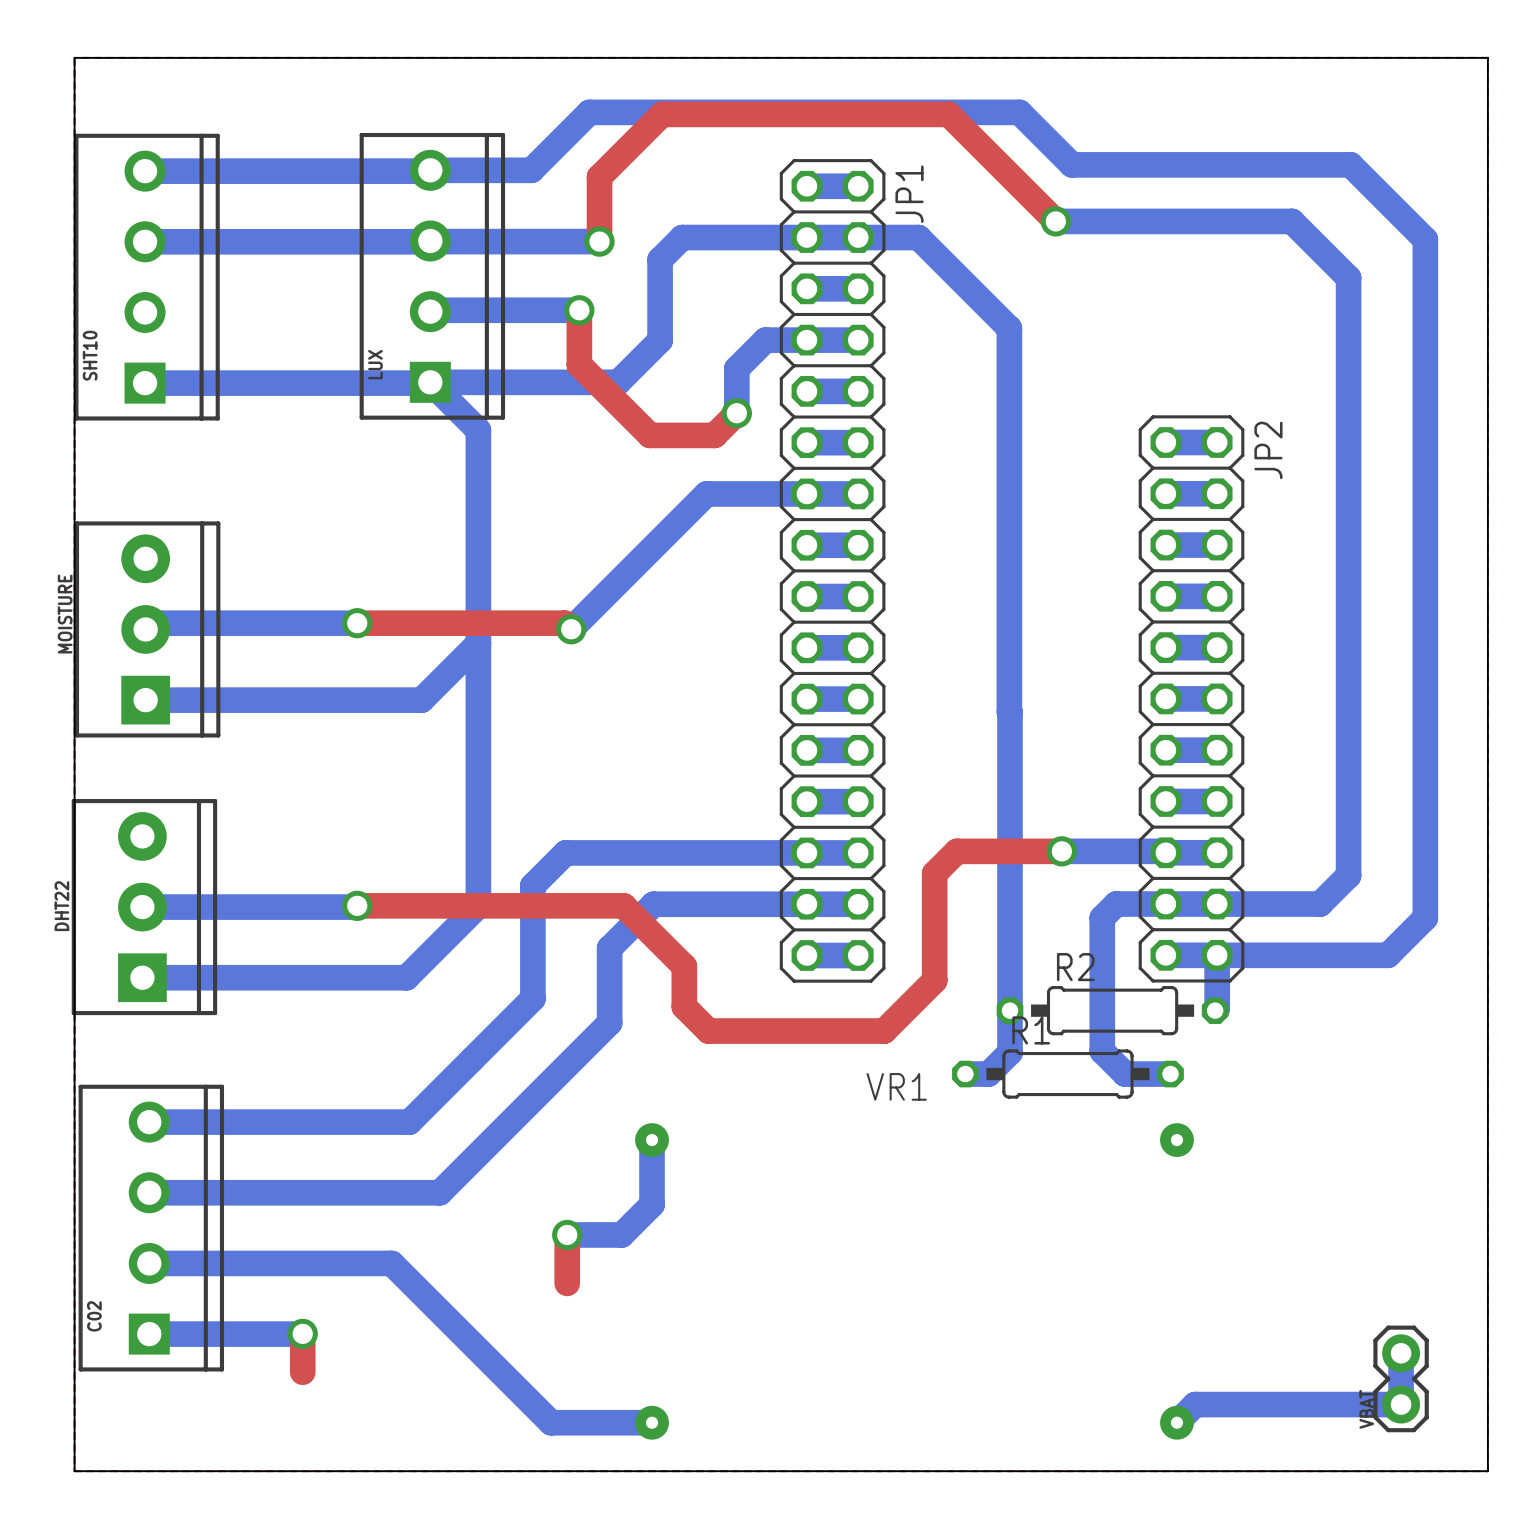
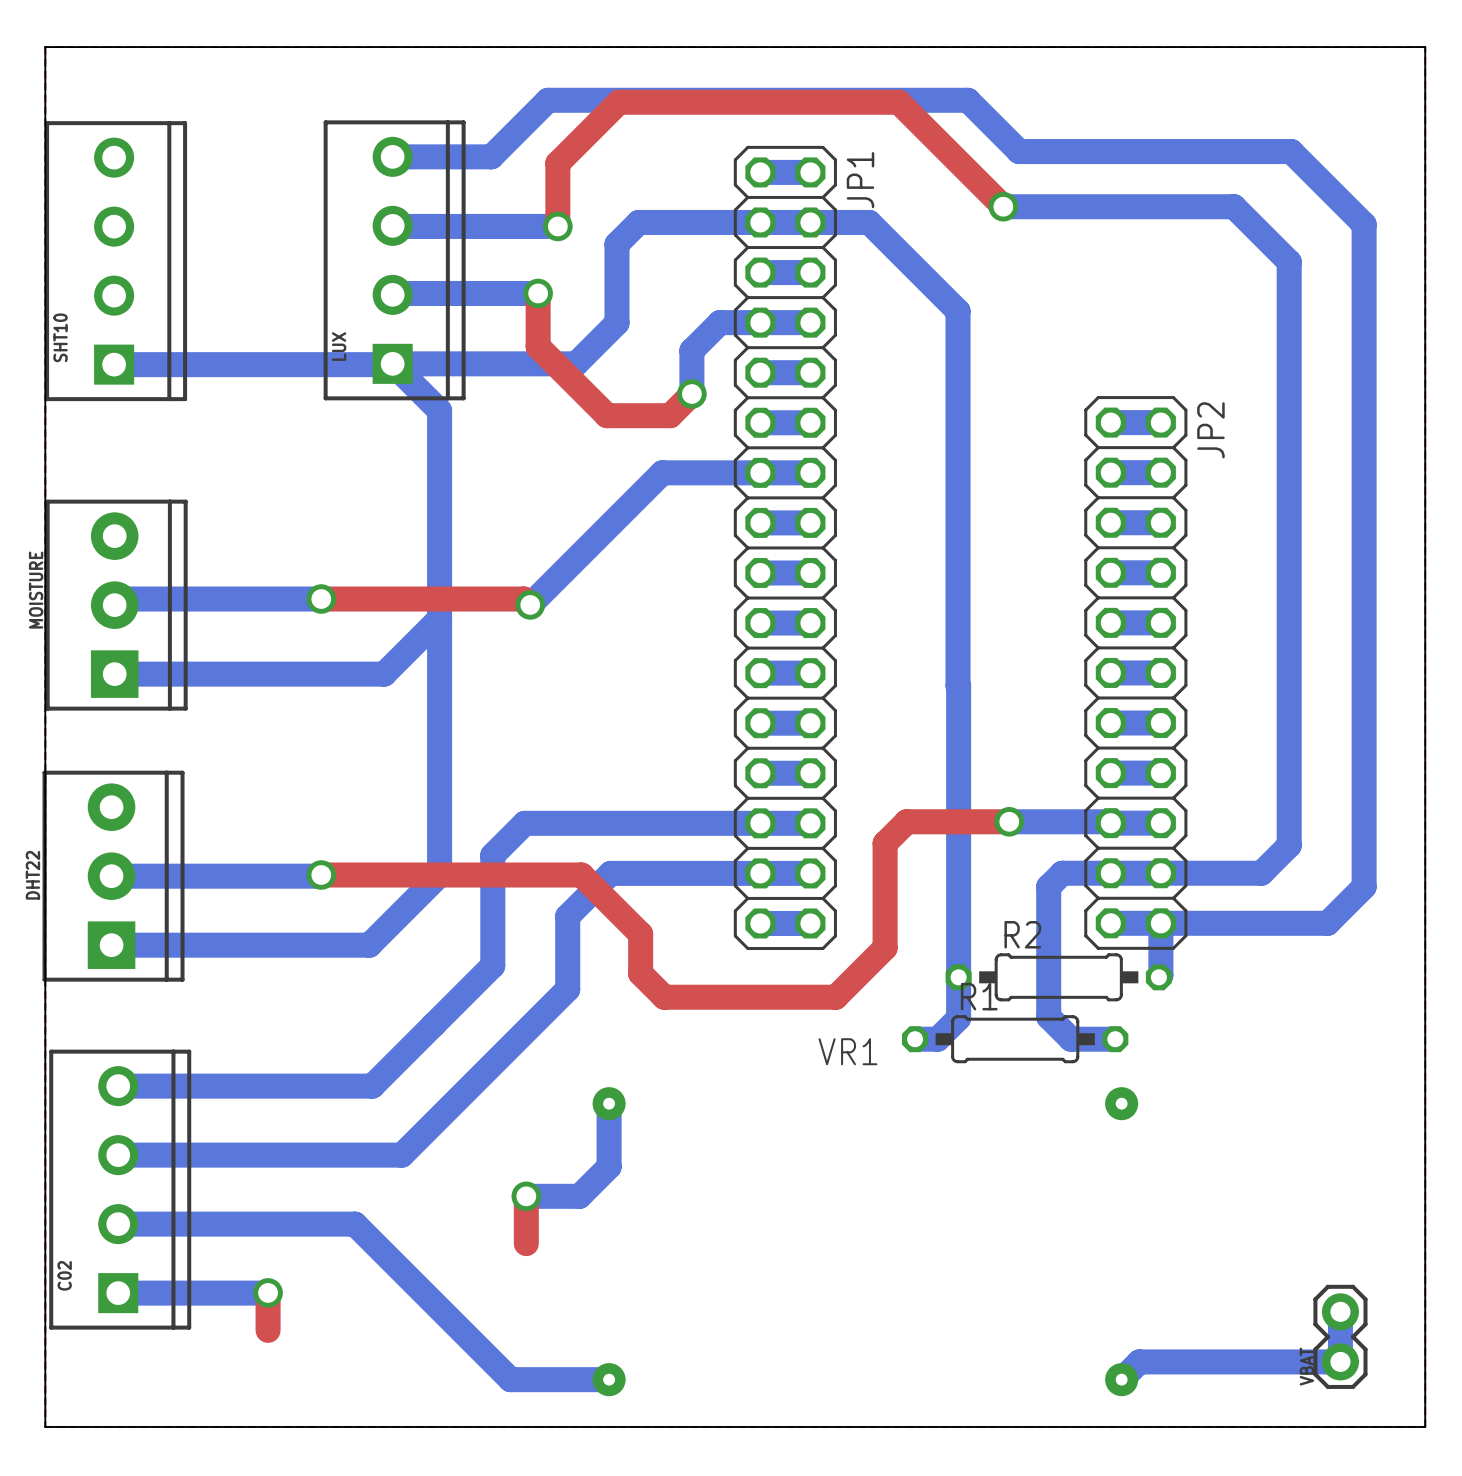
bottom track: (145, 171) (429, 171) -> none
bottom track: (145, 241) (429, 241) -> none

